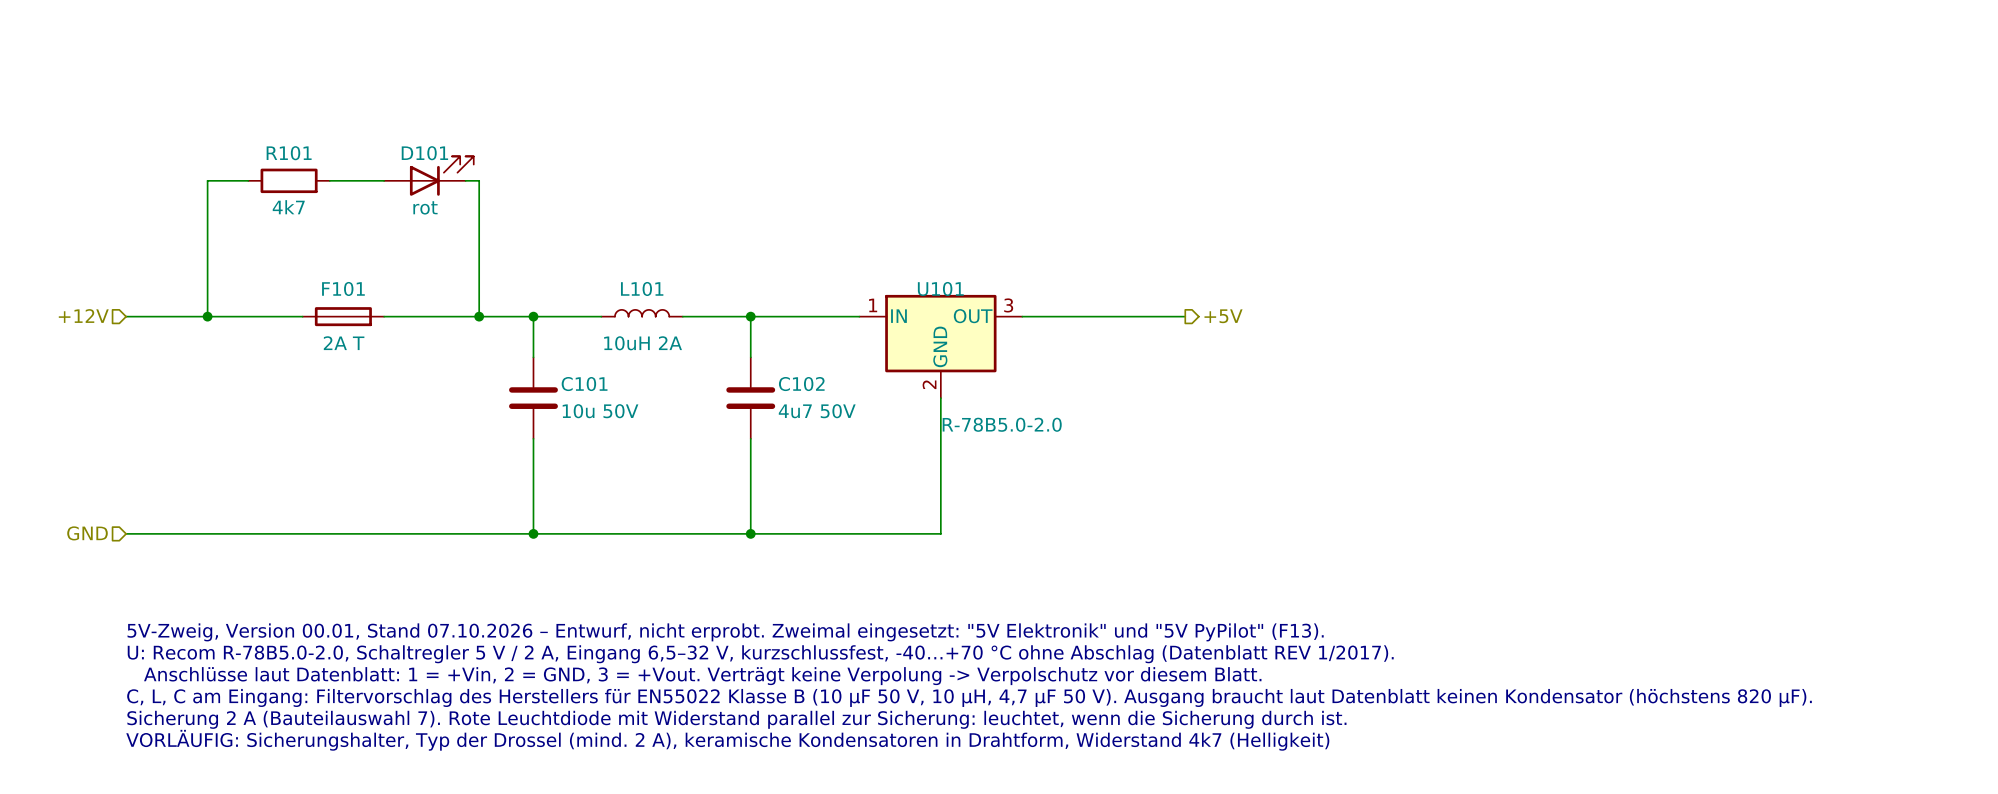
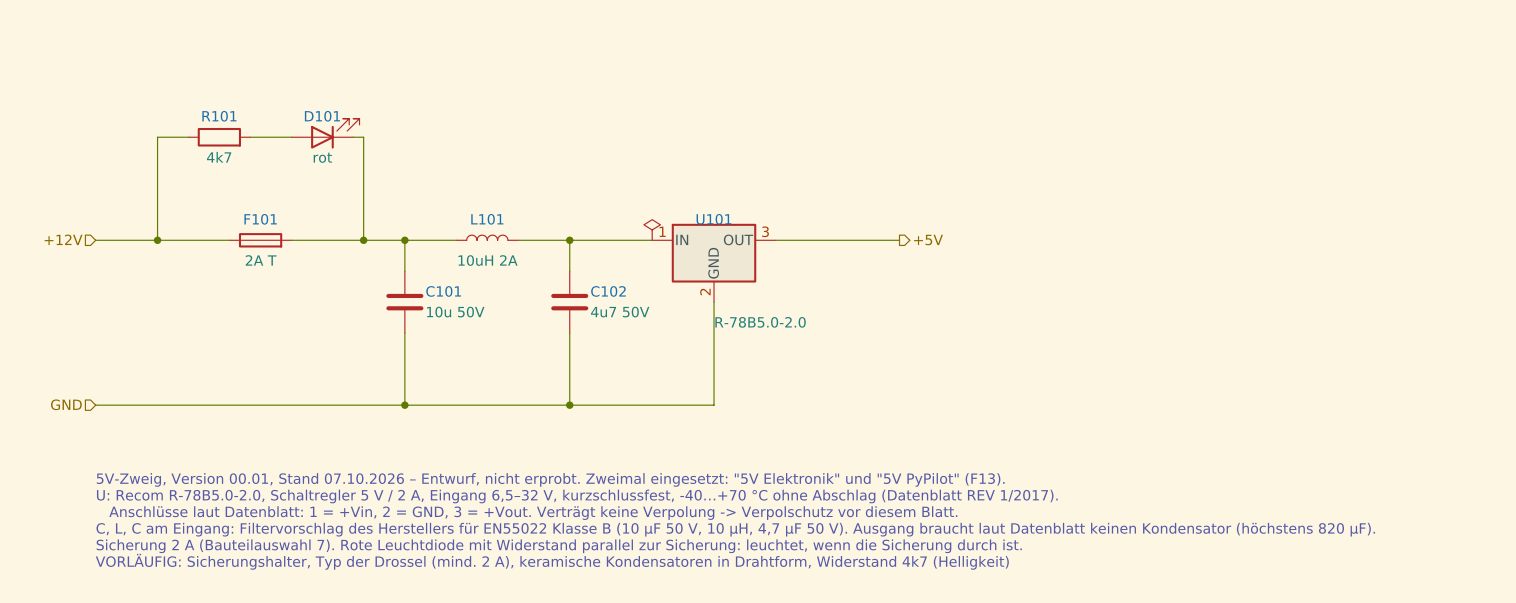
power symbol: none -> (652, 229)

